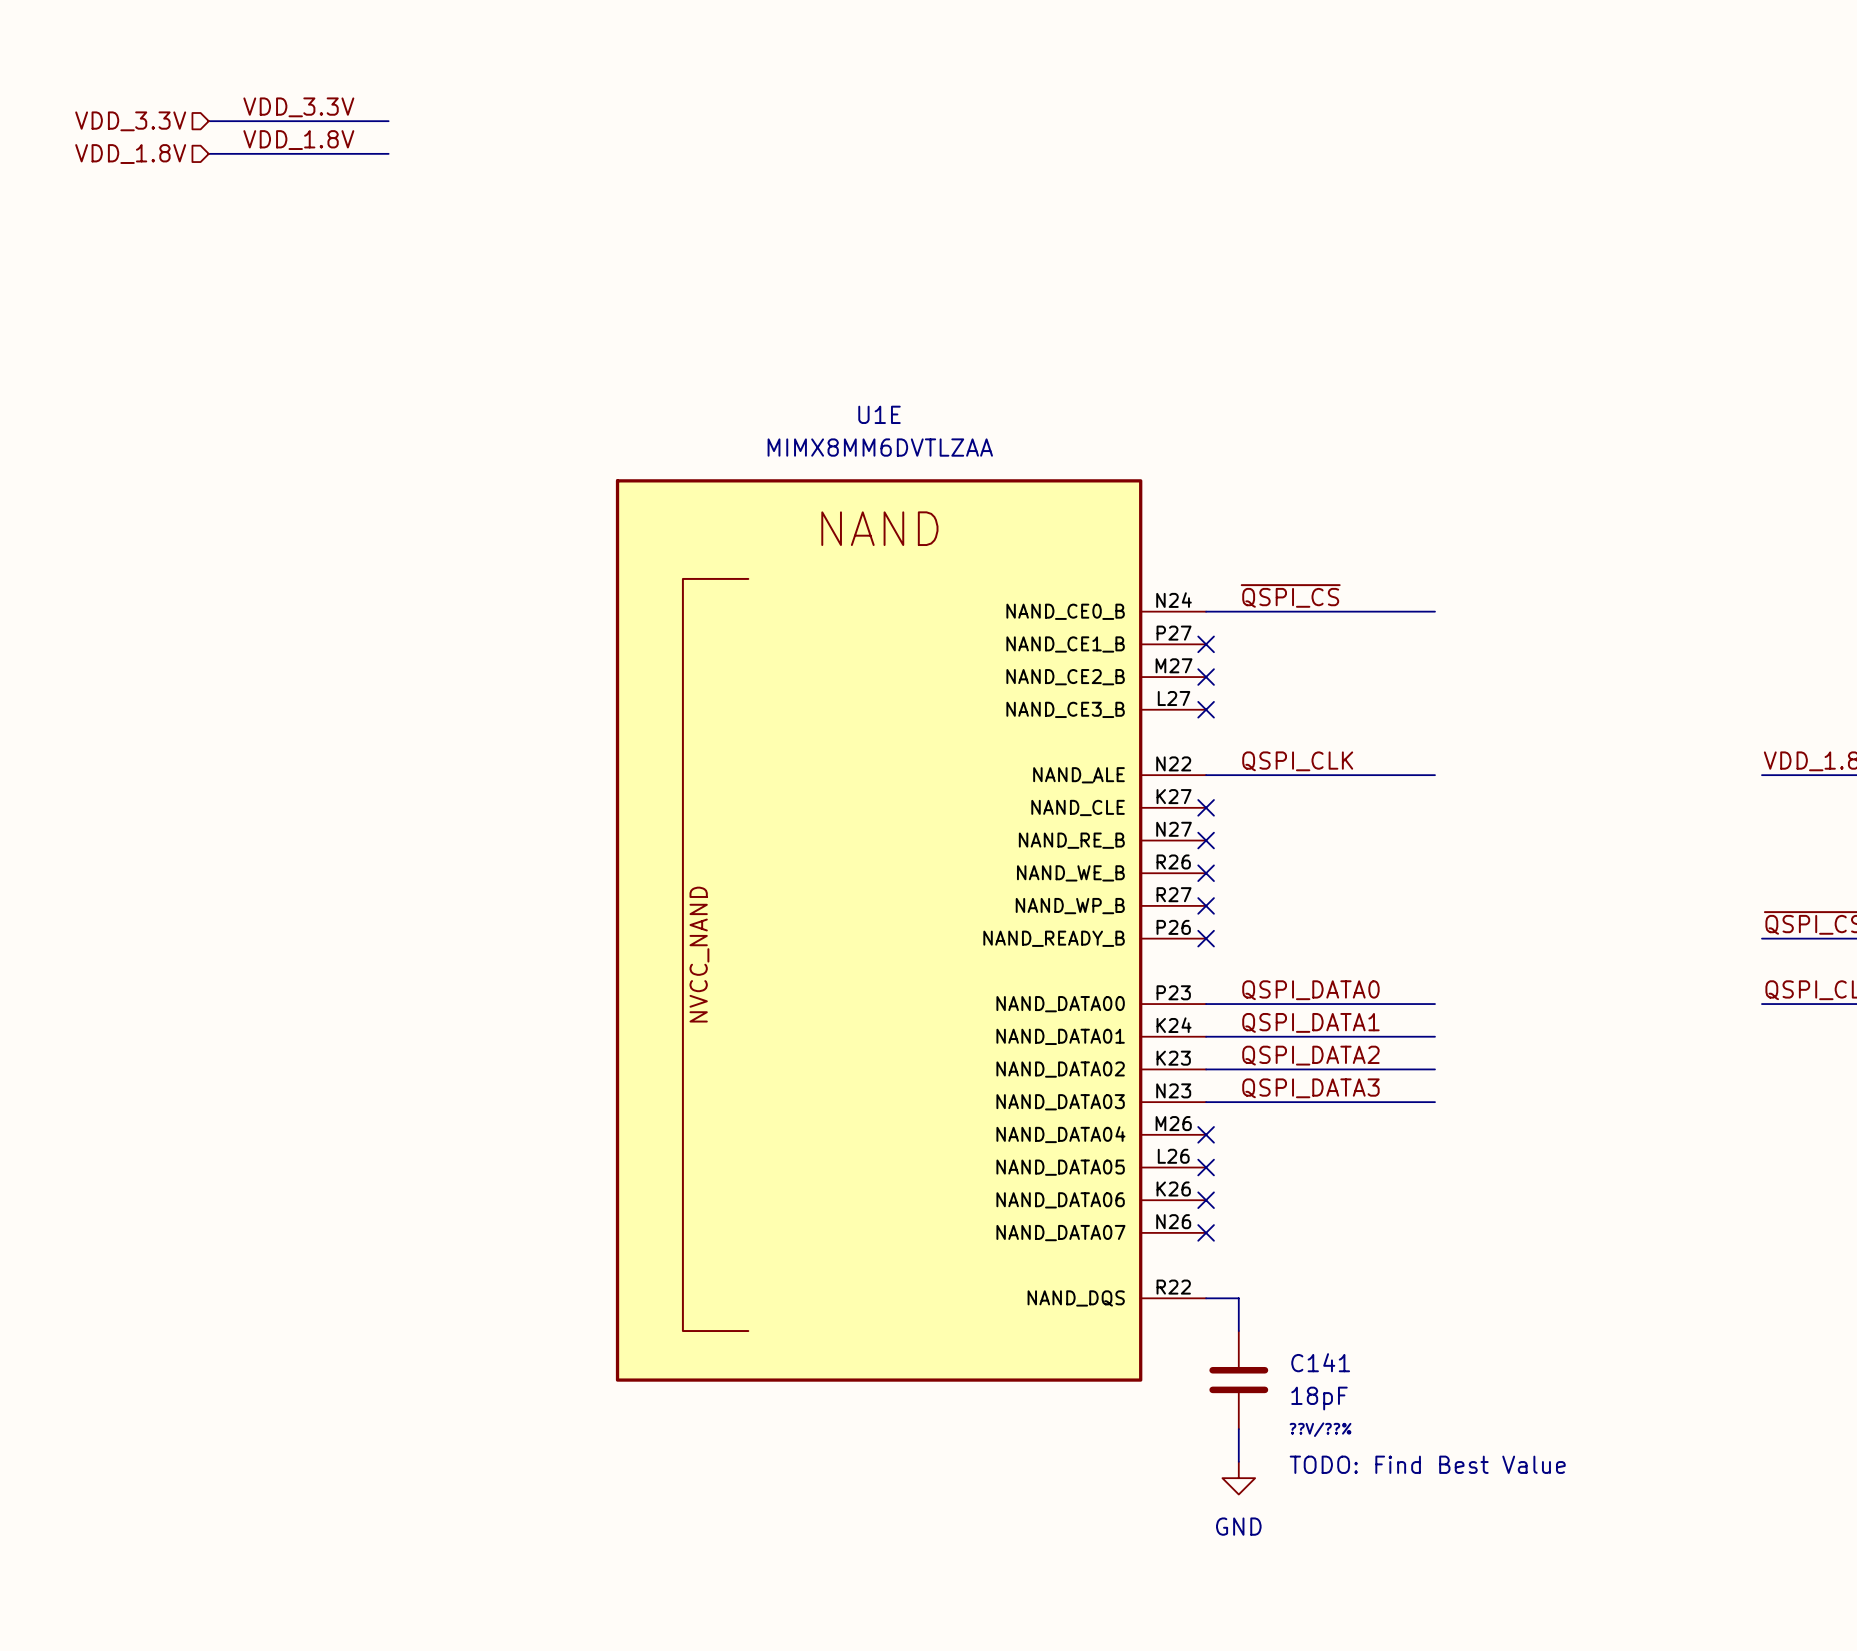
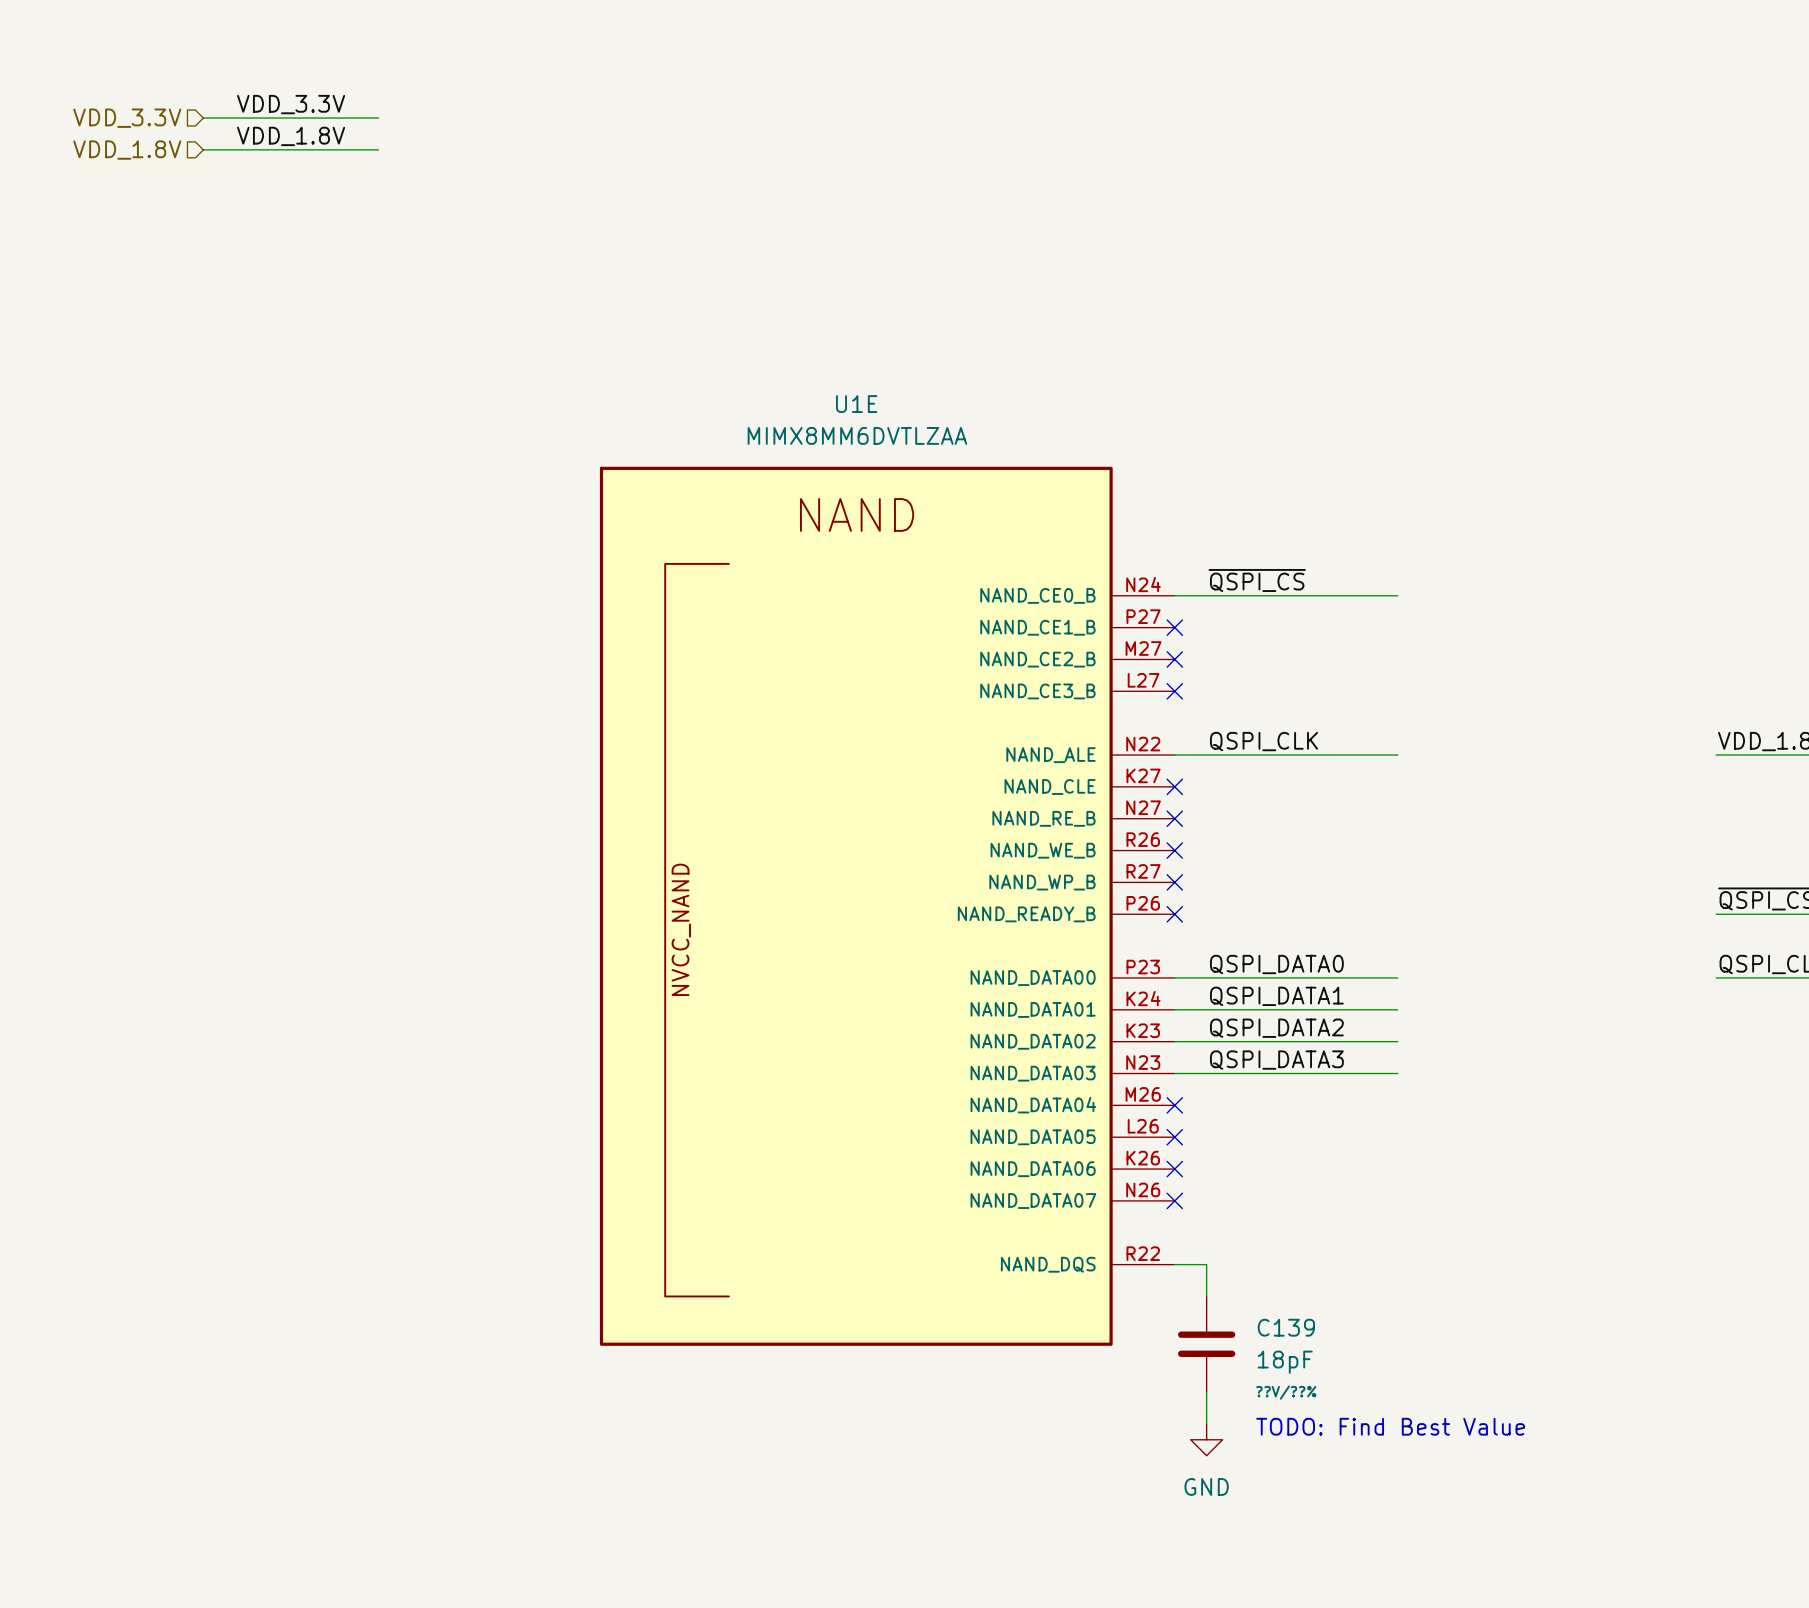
C141 name: C141 (1320, 1362) -> C139 (1286, 1327)

